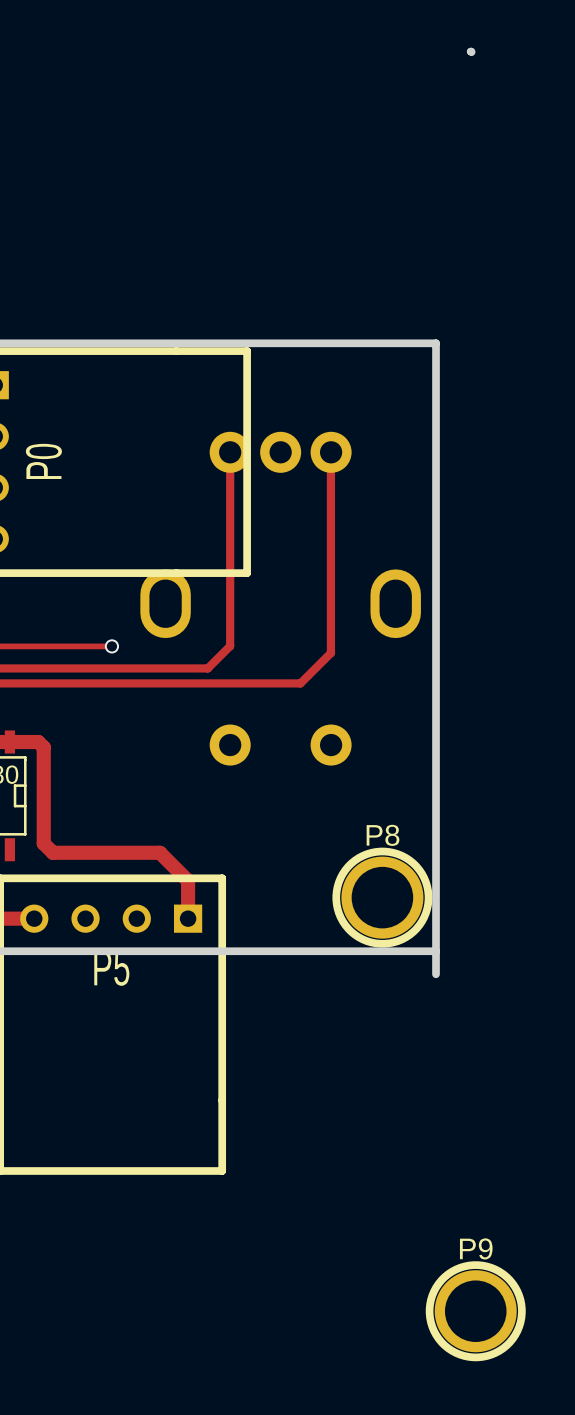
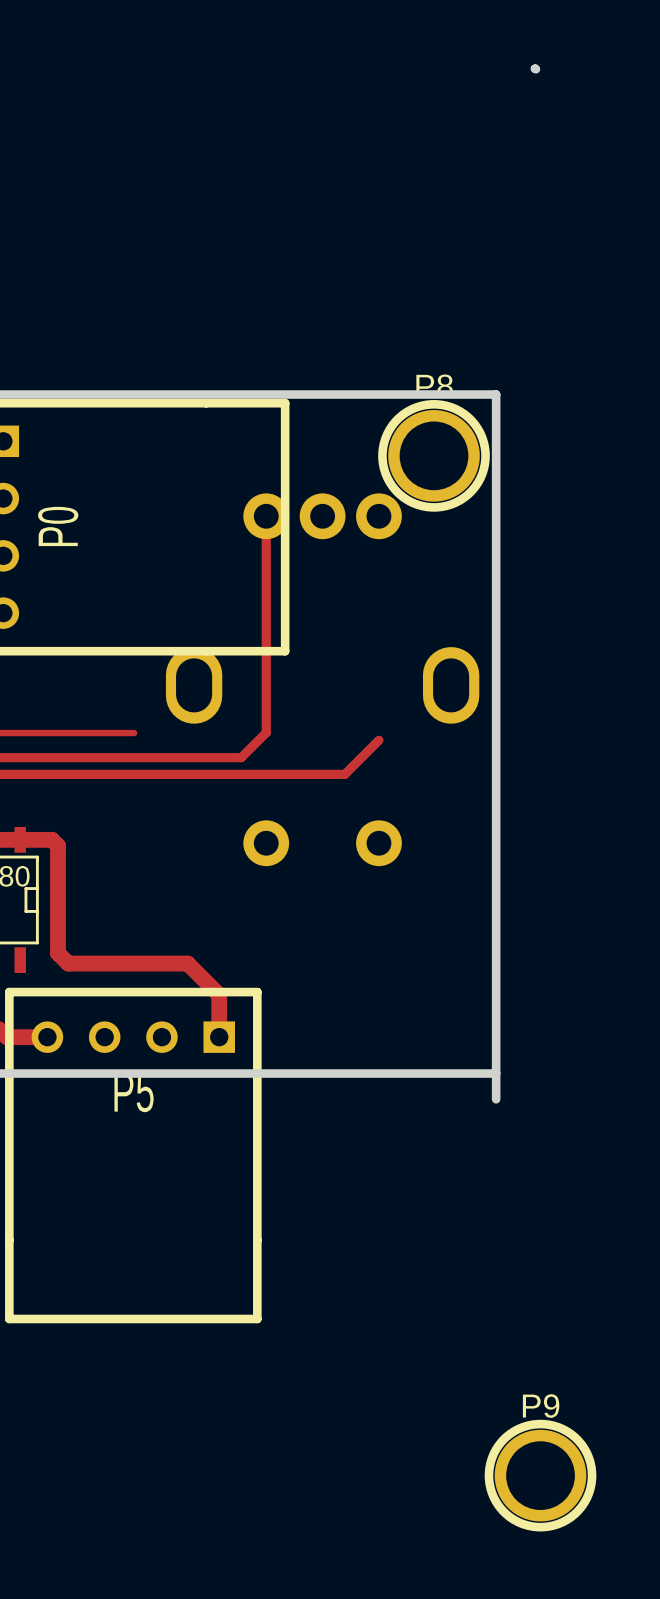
track: (330, 452) (330, 653) -> none
via: (111, 646) -> none
P8 position: (382, 897) -> (434, 455)

